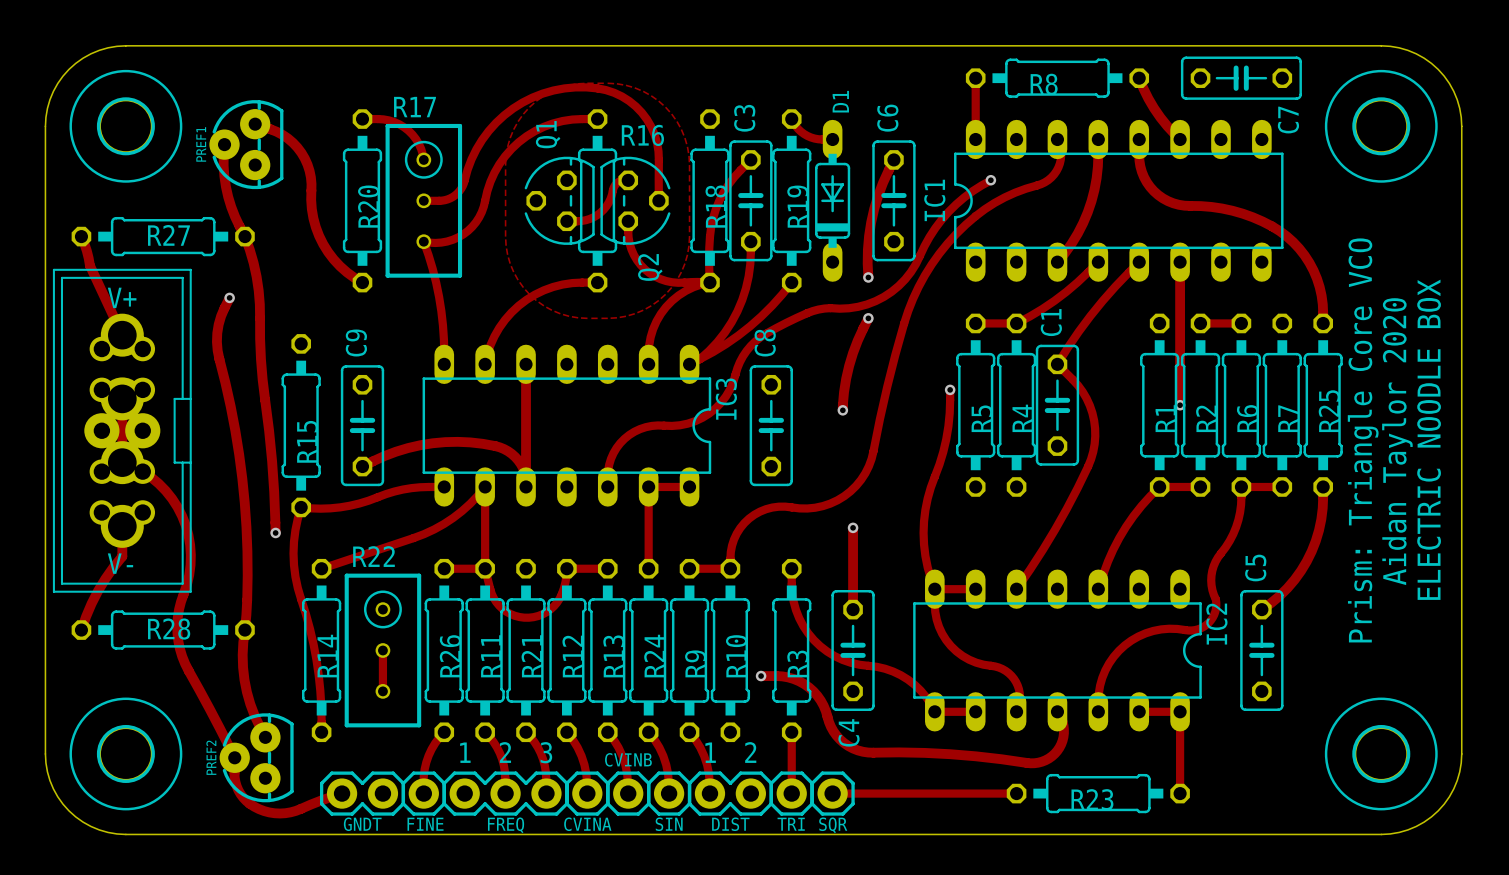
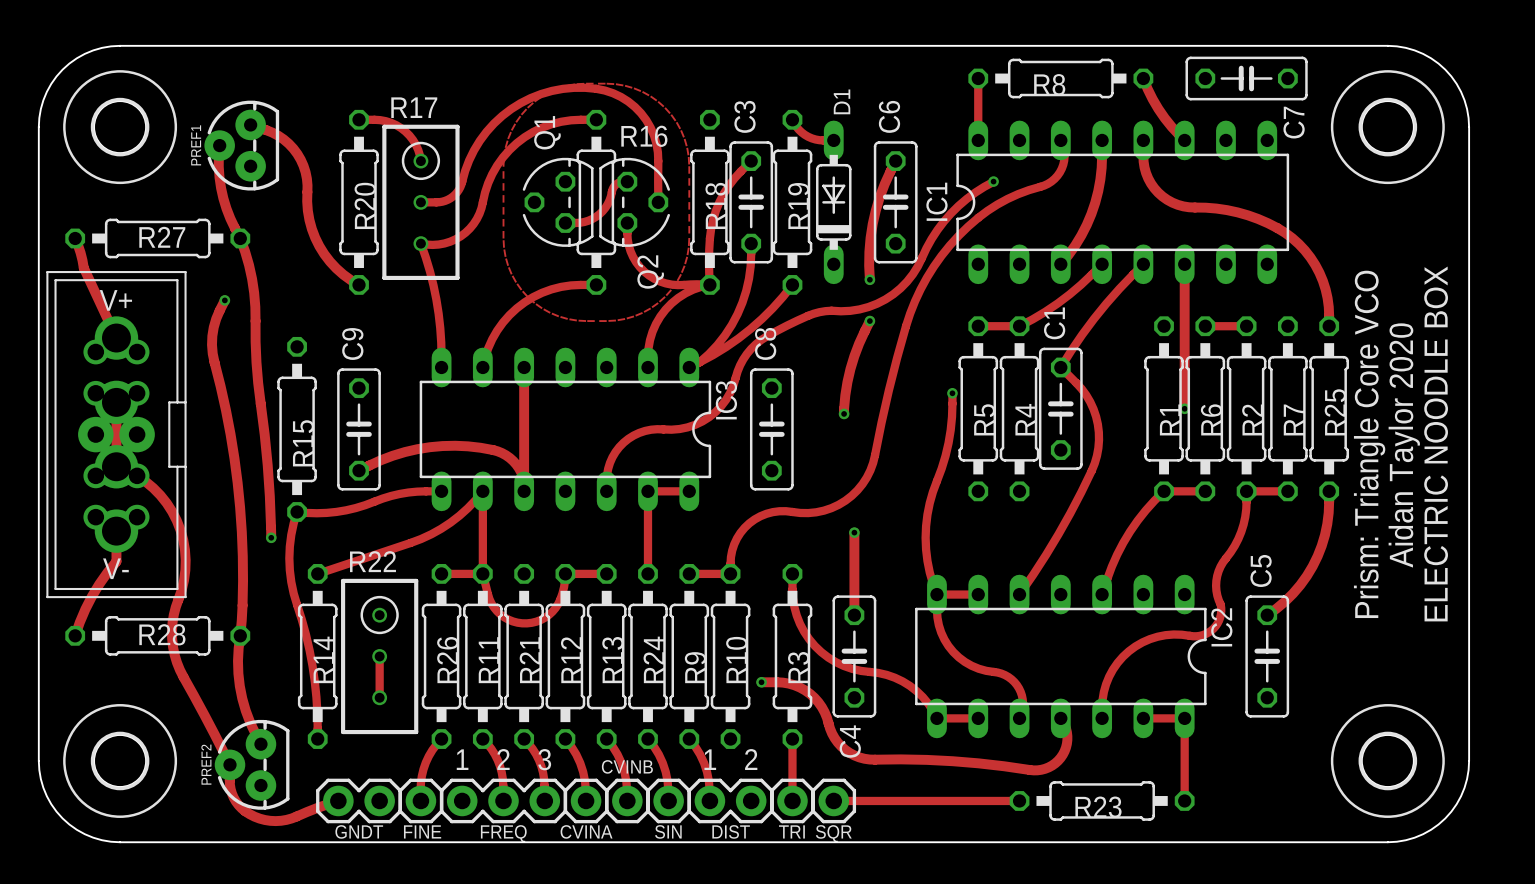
R2 name position: R2 (1206, 418) -> R2 (1252, 419)
R6 name position: R6 (1247, 418) -> R6 (1211, 419)

